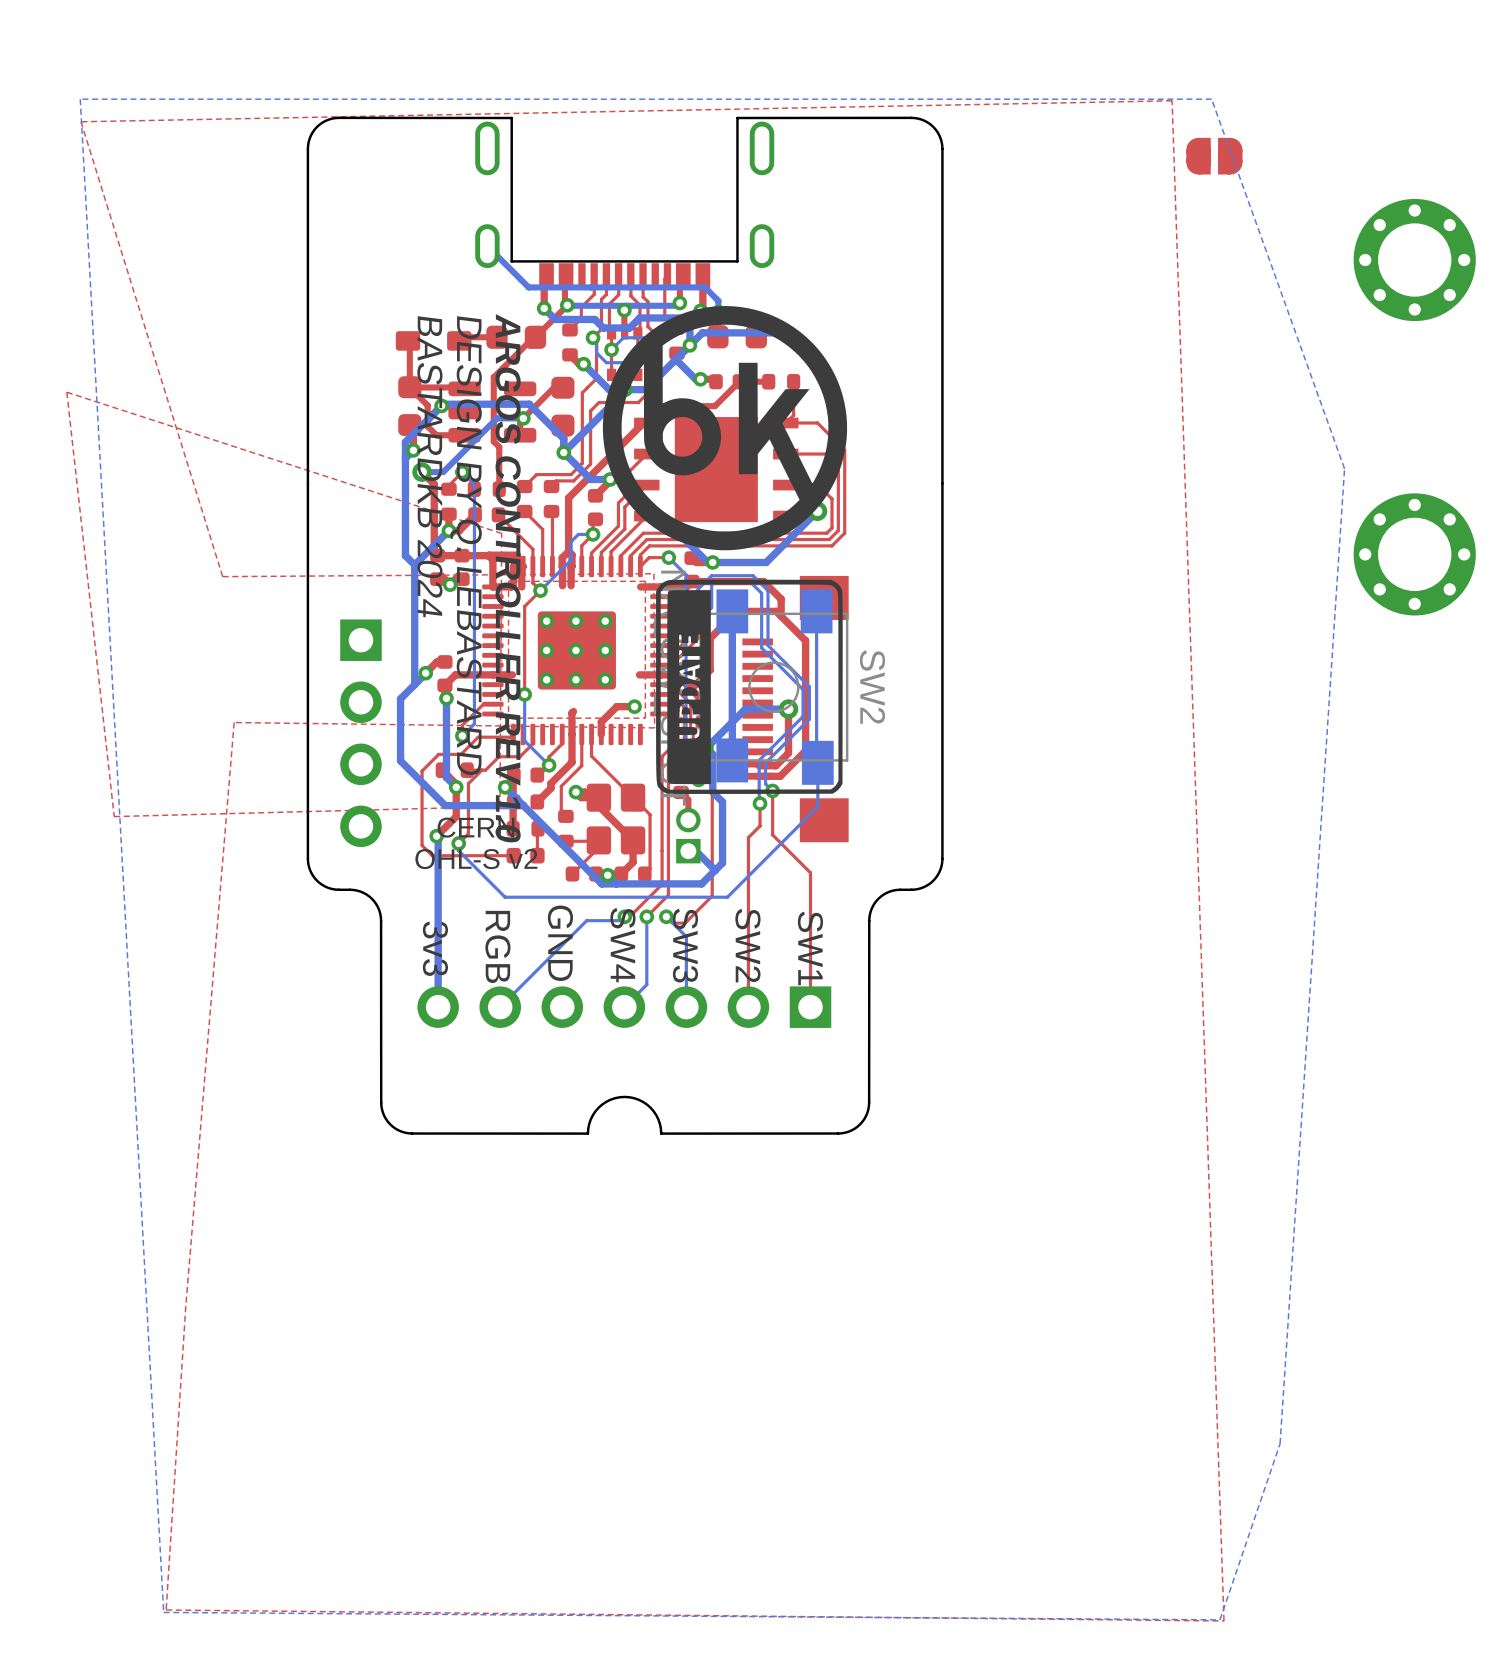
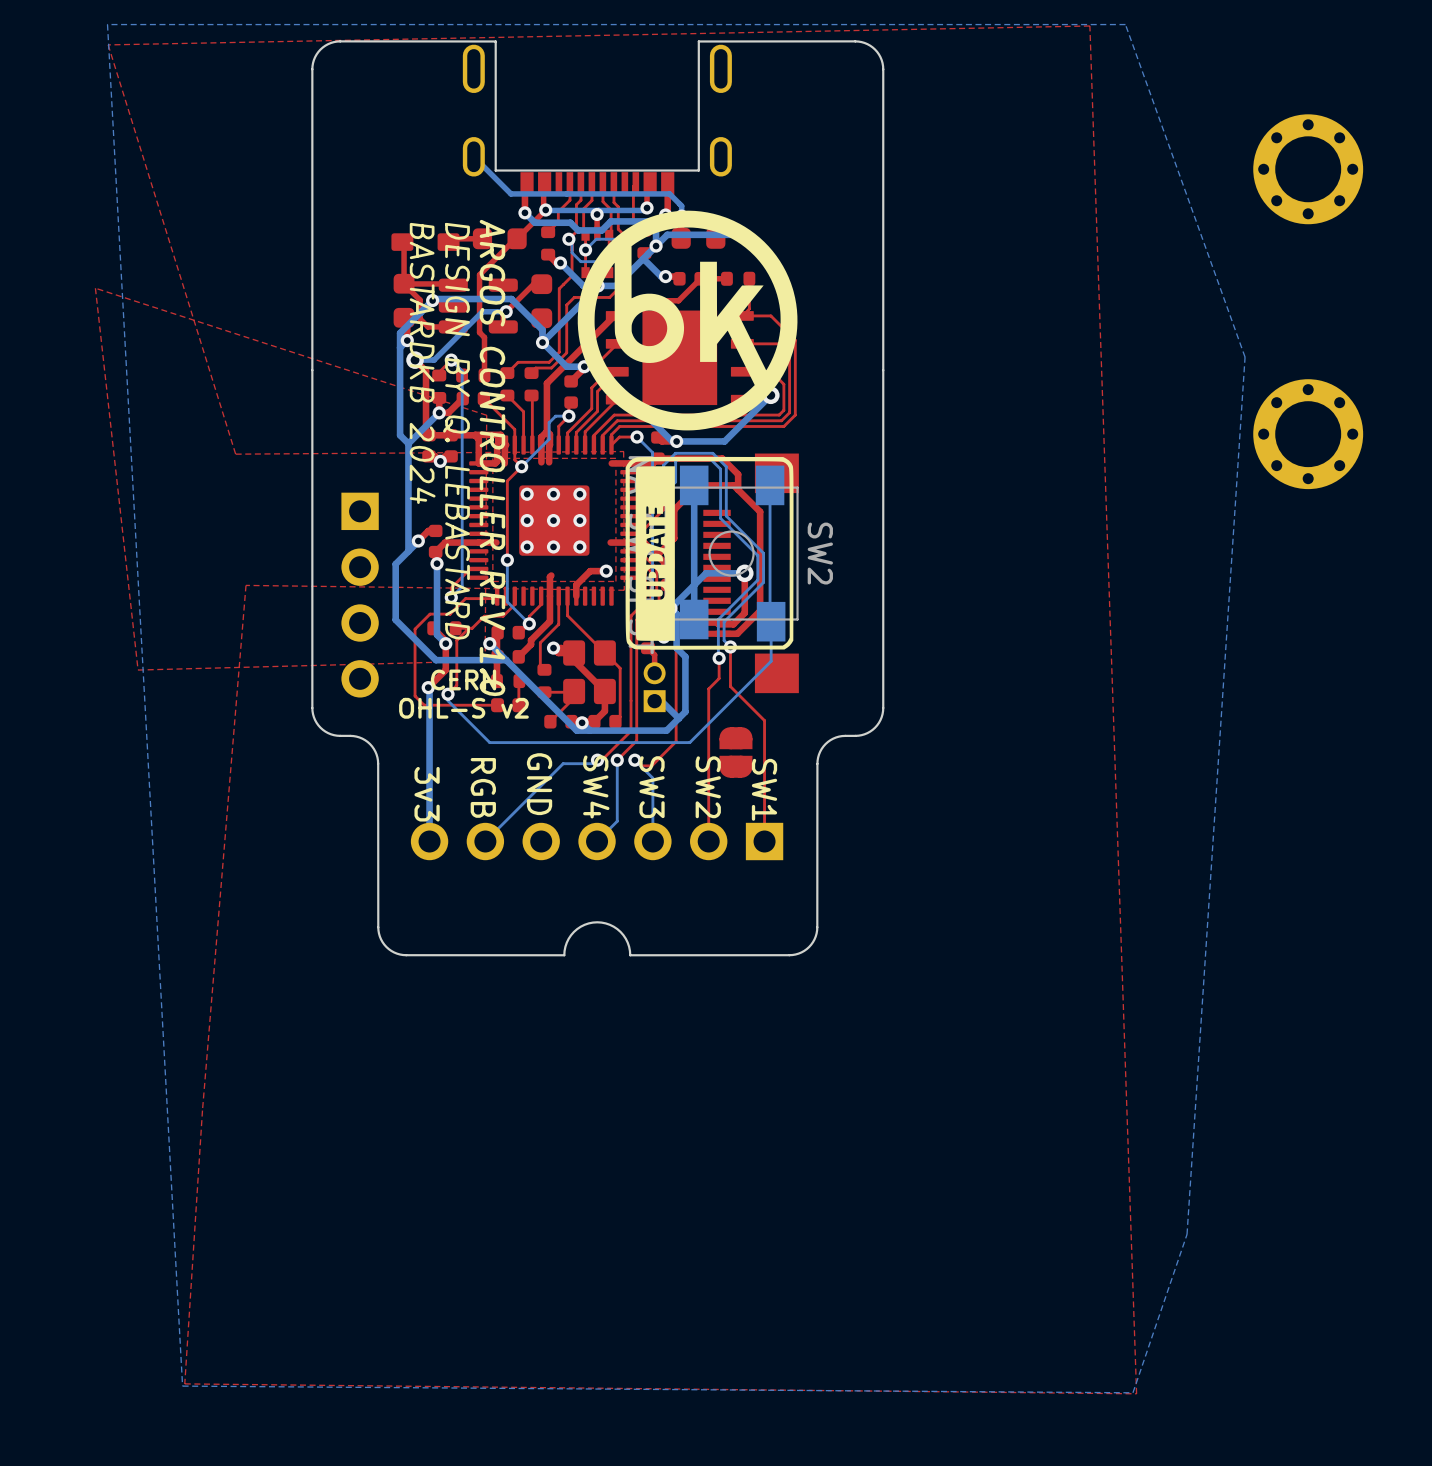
part: (1214, 156) -> none
part: none -> (735, 752)

